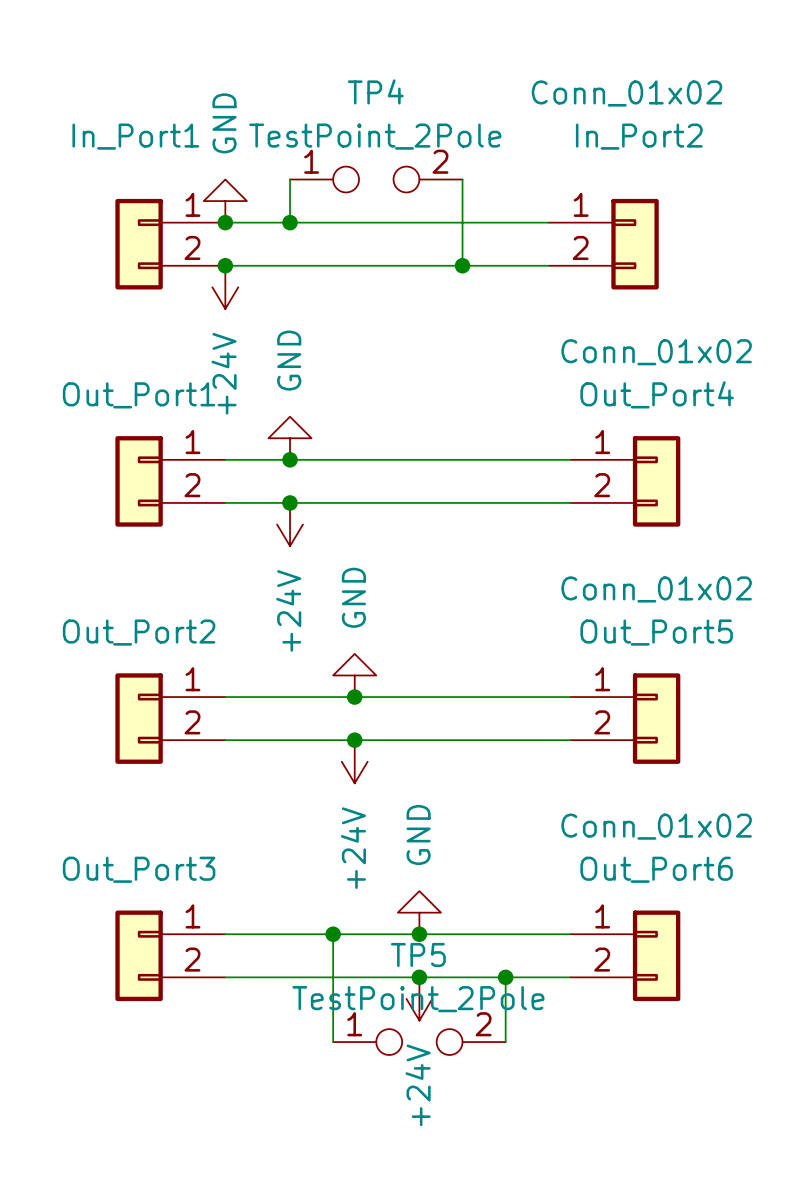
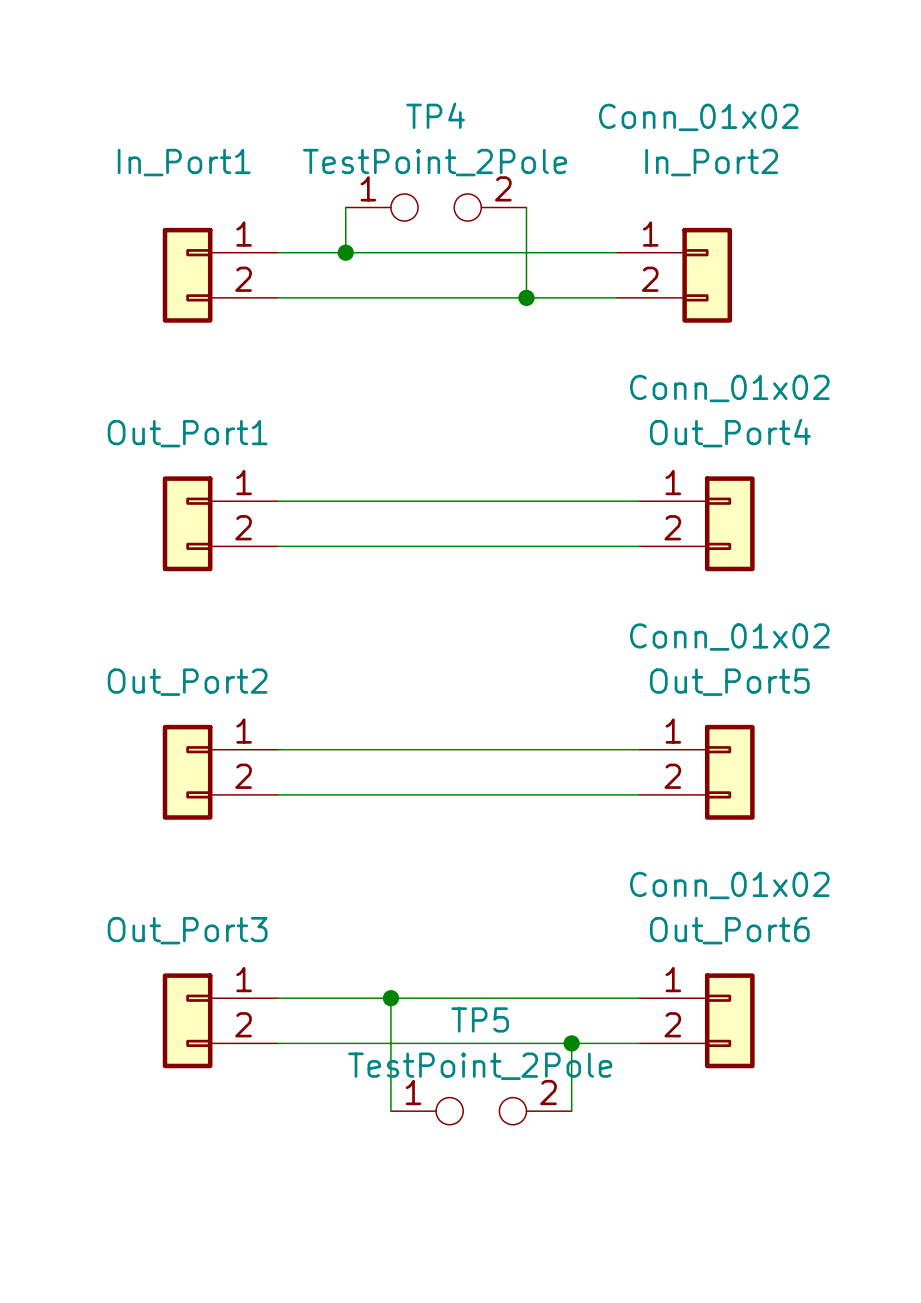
power symbol: GND (225, 201) -> none
junction: (225, 222) -> none
junction: (225, 265) -> none
power symbol: +24V (225, 287) -> none
power symbol: GND (290, 438) -> none
junction: (290, 459) -> none
junction: (290, 502) -> none
power symbol: +24V (290, 524) -> none
power symbol: GND (354, 675) -> none
junction: (354, 697) -> none
junction: (354, 740) -> none
power symbol: +24V (354, 761) -> none
power symbol: GND (419, 912) -> none
junction: (419, 934) -> none
junction: (419, 977) -> none
power symbol: +24V (419, 998) -> none

